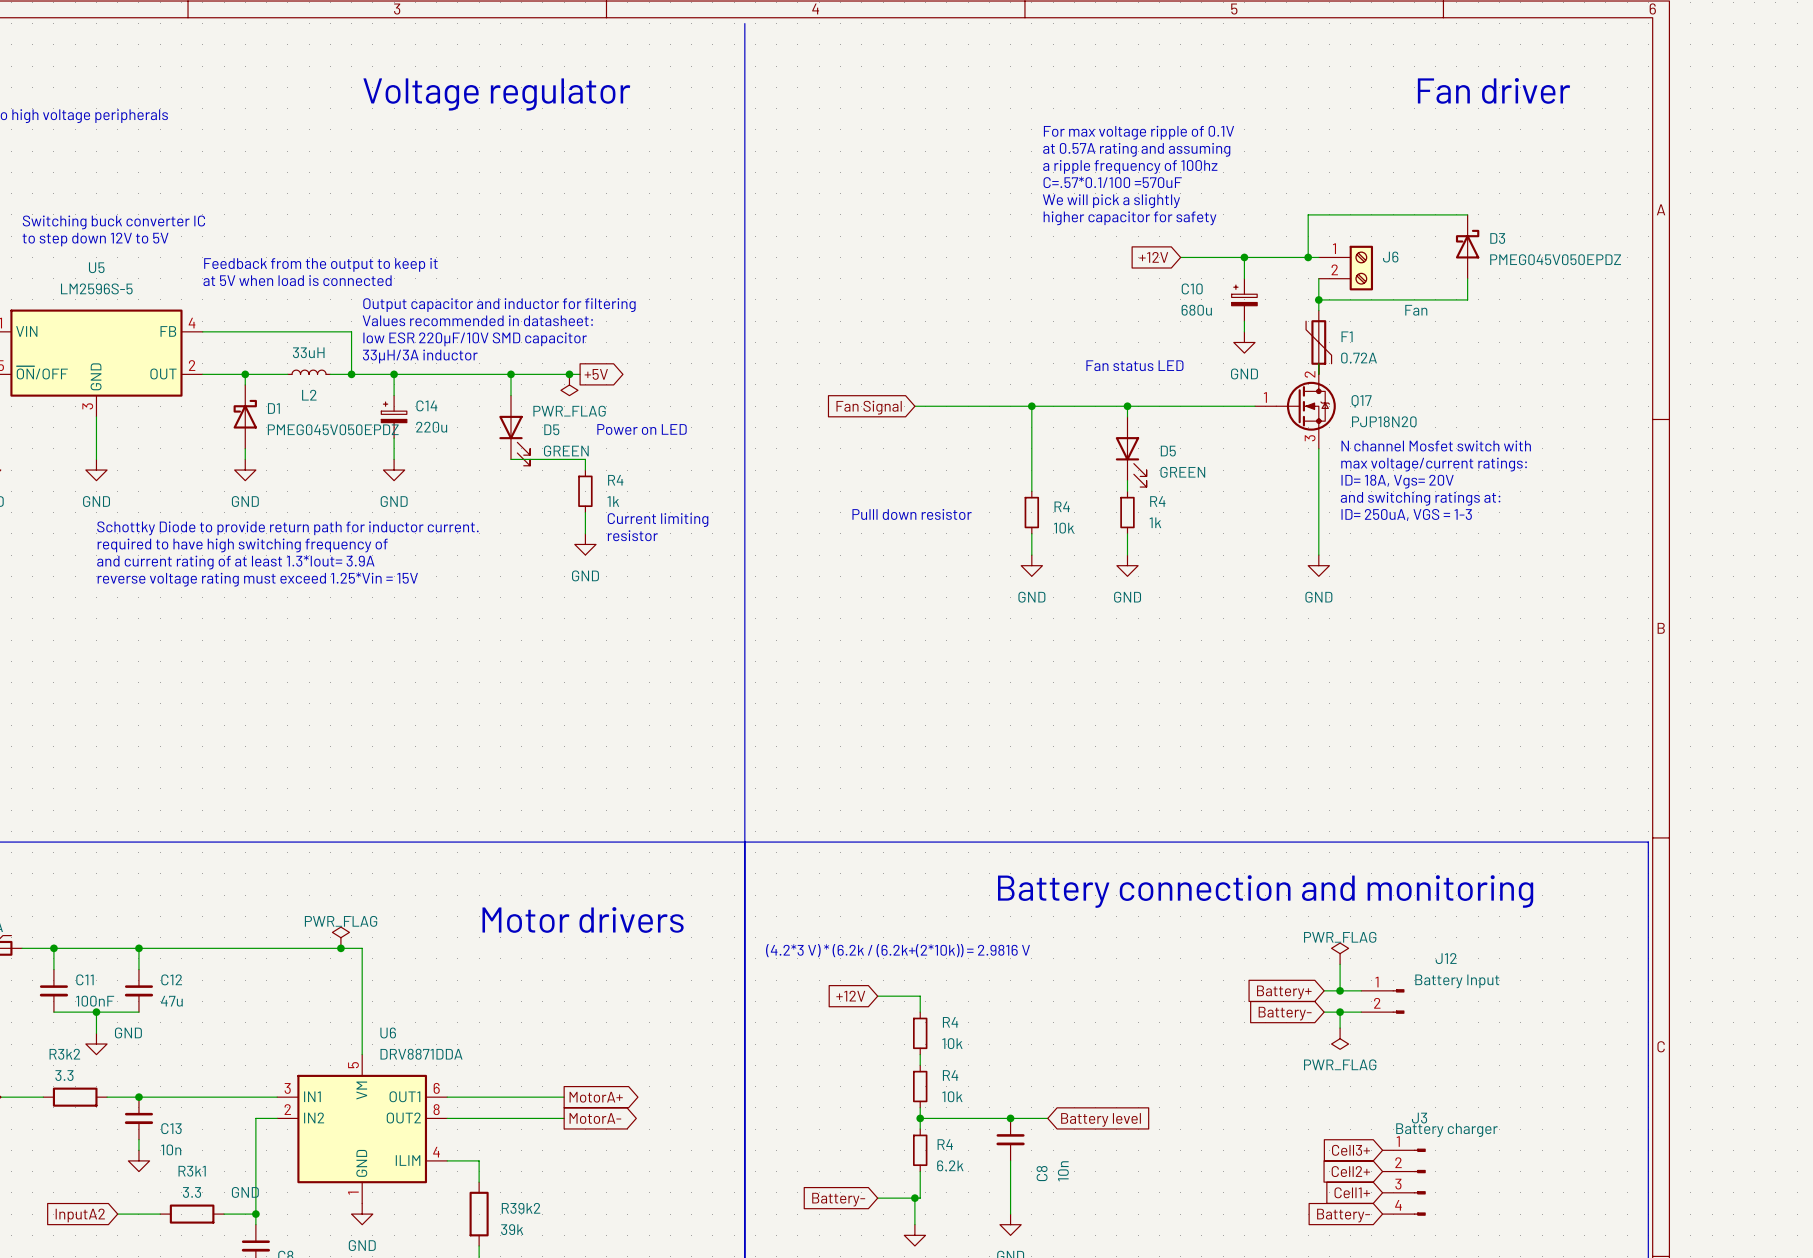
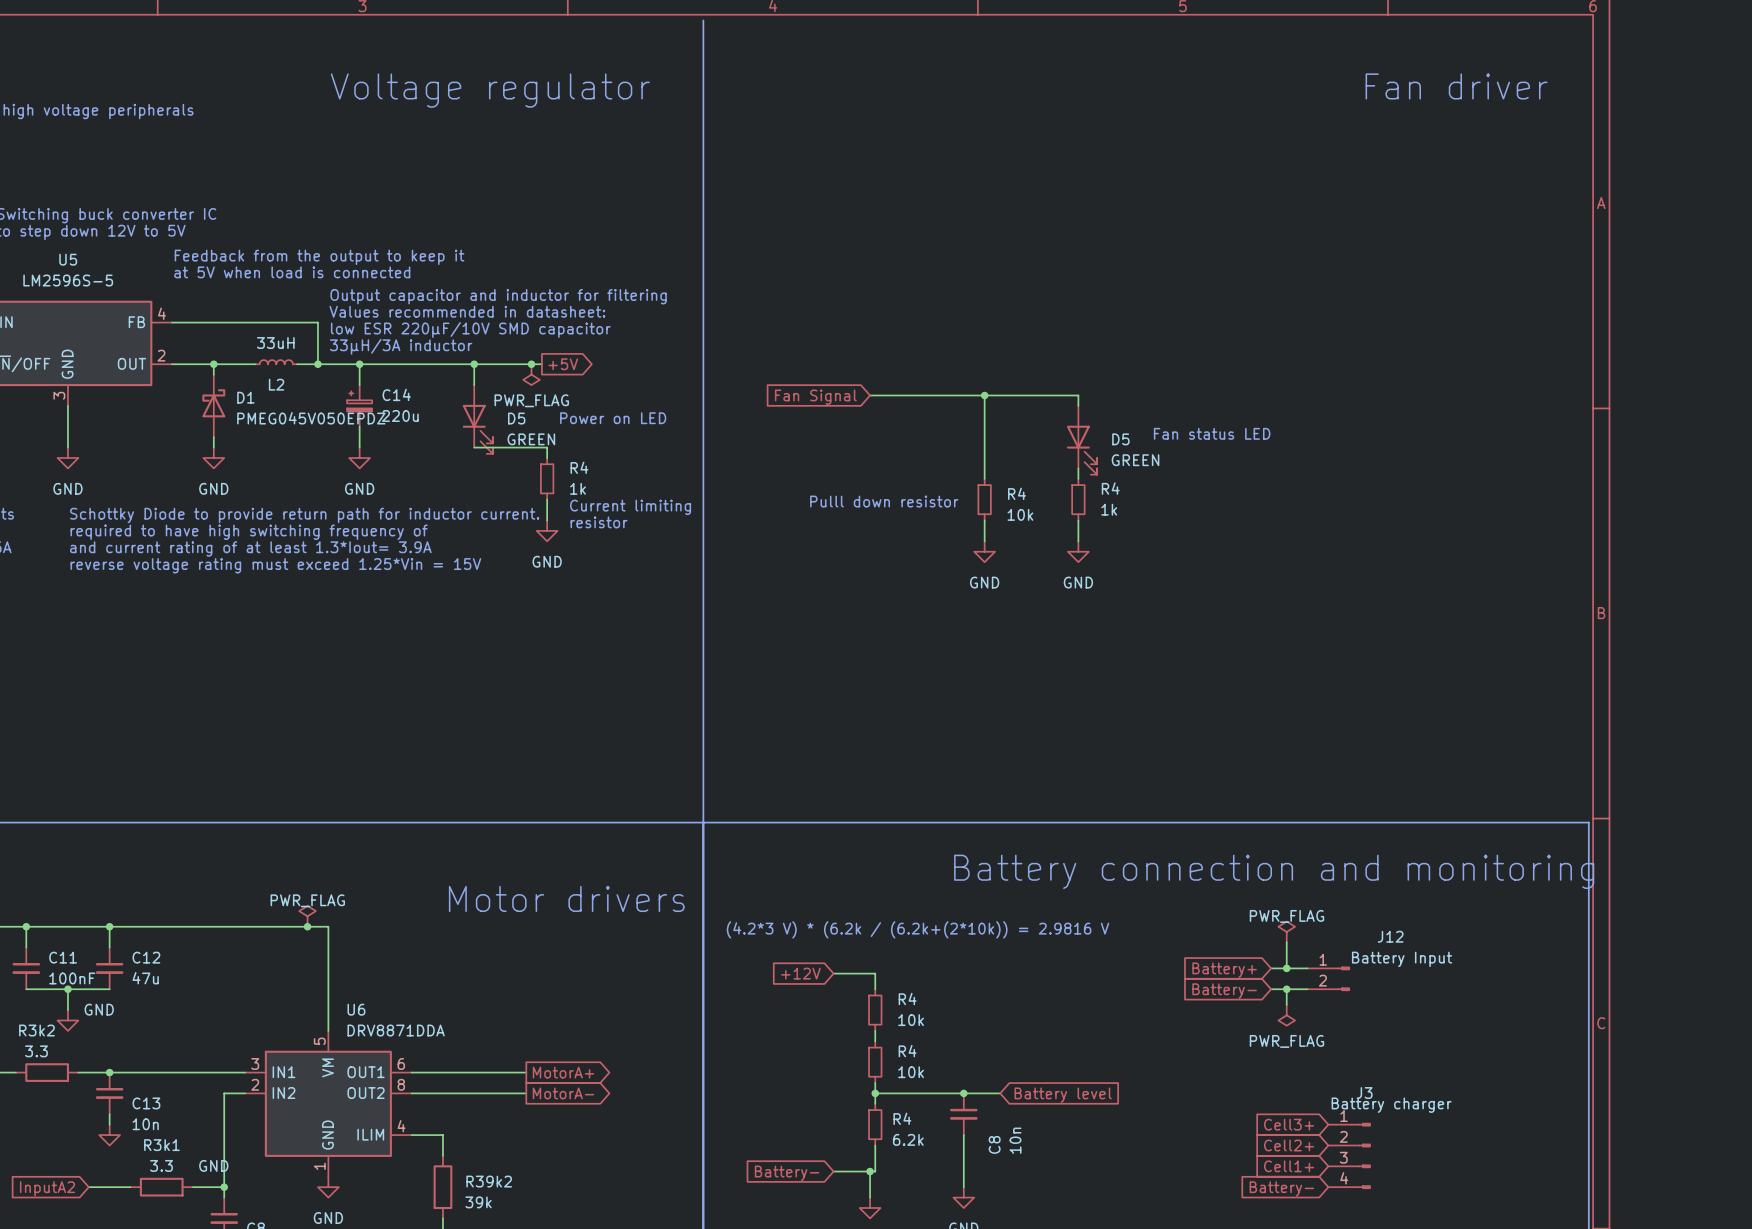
text: For max voltage ripple of 0.1V (1138, 132) -> none
text: at 0.57A rating and assuming (1136, 149) -> none
text: a ripple frequency of 100hz (1130, 166) -> none
text: C=.57*0.1/100 =570uF (1112, 182) -> none
text: We will pick a slightly (1111, 201) -> none
wire: (1467, 214) (1308, 214) (1308, 257) -> none
text: higher capacitor for safety (1130, 218) -> none
D3: PMEG045V050EPDZ (1467, 246) -> none
global label: +12V (1153, 257) -> none
wire: (1180, 257) (1318, 257) -> none
wire: (1244, 257) (1244, 278) -> none
junction: (1244, 257) -> none
junction: (1308, 257) -> none
J6: Fan (1345, 268) -> none
wire: (1318, 278) (1318, 310) -> none
wire: (1467, 278) (1467, 299) (1318, 299) -> none
C10: 680u (1244, 299) -> none
junction: (1318, 299) -> none
wire: (1244, 321) (1244, 331) -> none
power symbol: GND (1244, 342) -> none
F1: 0.72A (1318, 342) -> none
wire: (1318, 363) (1318, 374) -> none
text position: Fan status LED (1134, 365) -> Fan status LED (1212, 433)
wire: (1127, 406) (1255, 406) -> none
junction: (1127, 406) -> none
Q17: PJP18N20 (1295, 406) -> none
text: N channel Mosfet switch with (1436, 446) -> none
wire: (1318, 448) (1318, 555) -> none
text: max voltage/current ratings: (1434, 464) -> none
text: ID= 18A, Vgs= 20V (1397, 481) -> none
text: and switching ratings at: (1420, 498) -> none
text: ID= 250uA, VGS = 1-3 (1406, 515) -> none
power symbol: GND (1318, 565) -> none

